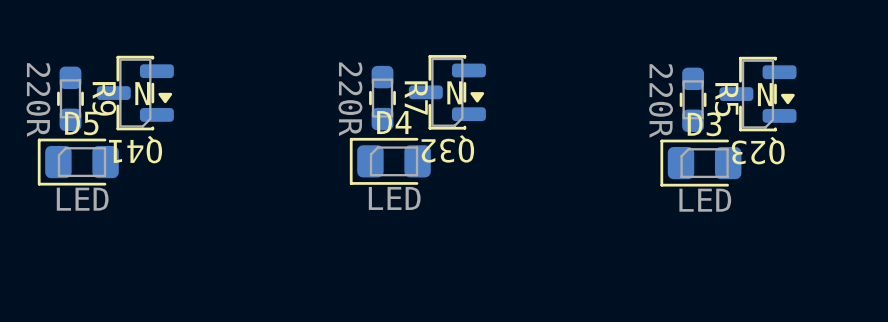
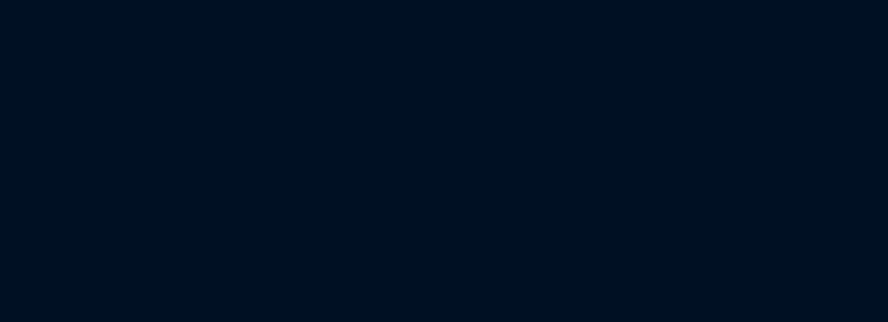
Q32: (447, 92) -> none
Q41: (135, 93) -> none
Q23: (757, 94) -> none
R9: 220R (70, 98) -> none
R7: 220R (382, 98) -> none
R5: 220R (693, 99) -> none
D4: LED (390, 161) -> none
D5: LED (78, 162) -> none
D3: LED (700, 163) -> none

